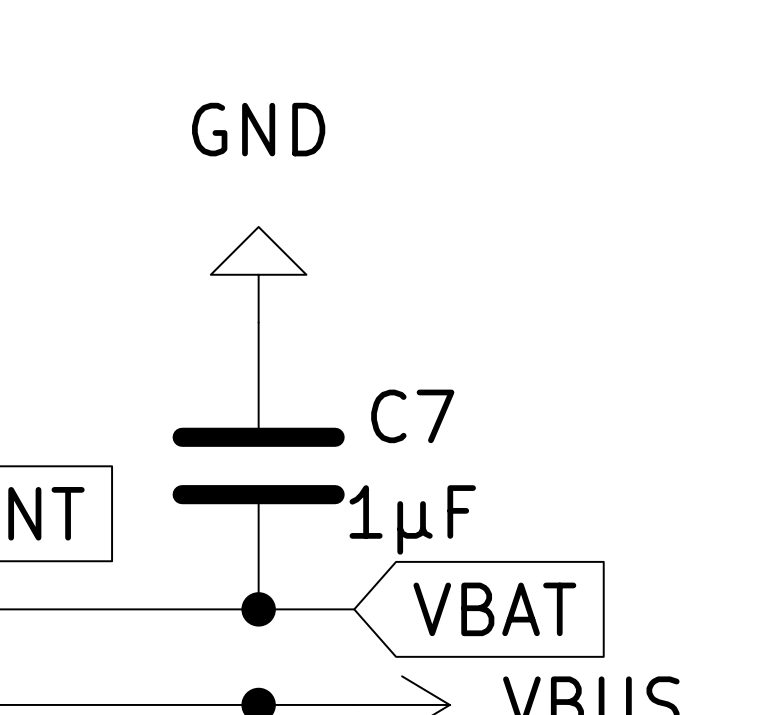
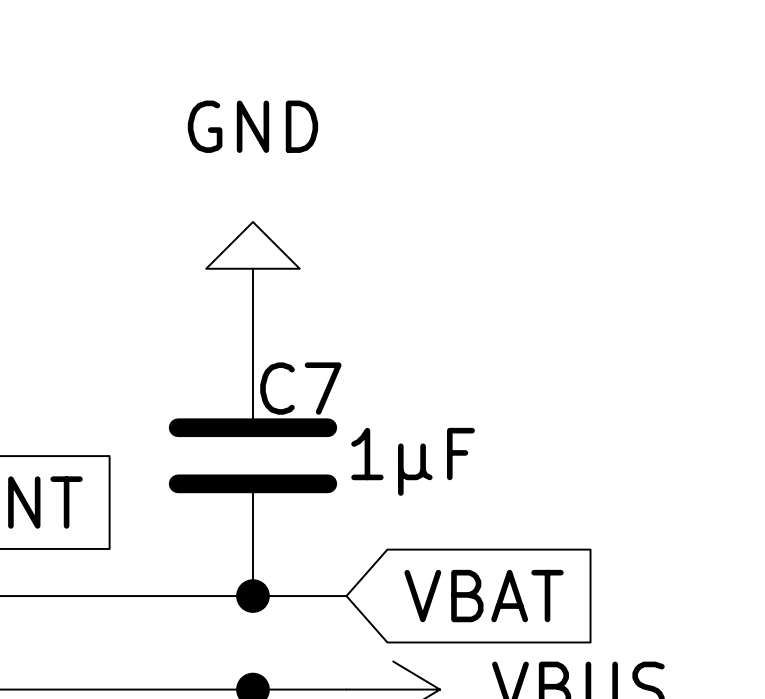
C7 name position: C7 (412, 416) -> C7 (300, 388)
C7 value position: 1µF (412, 519) -> 1µF (413, 461)

